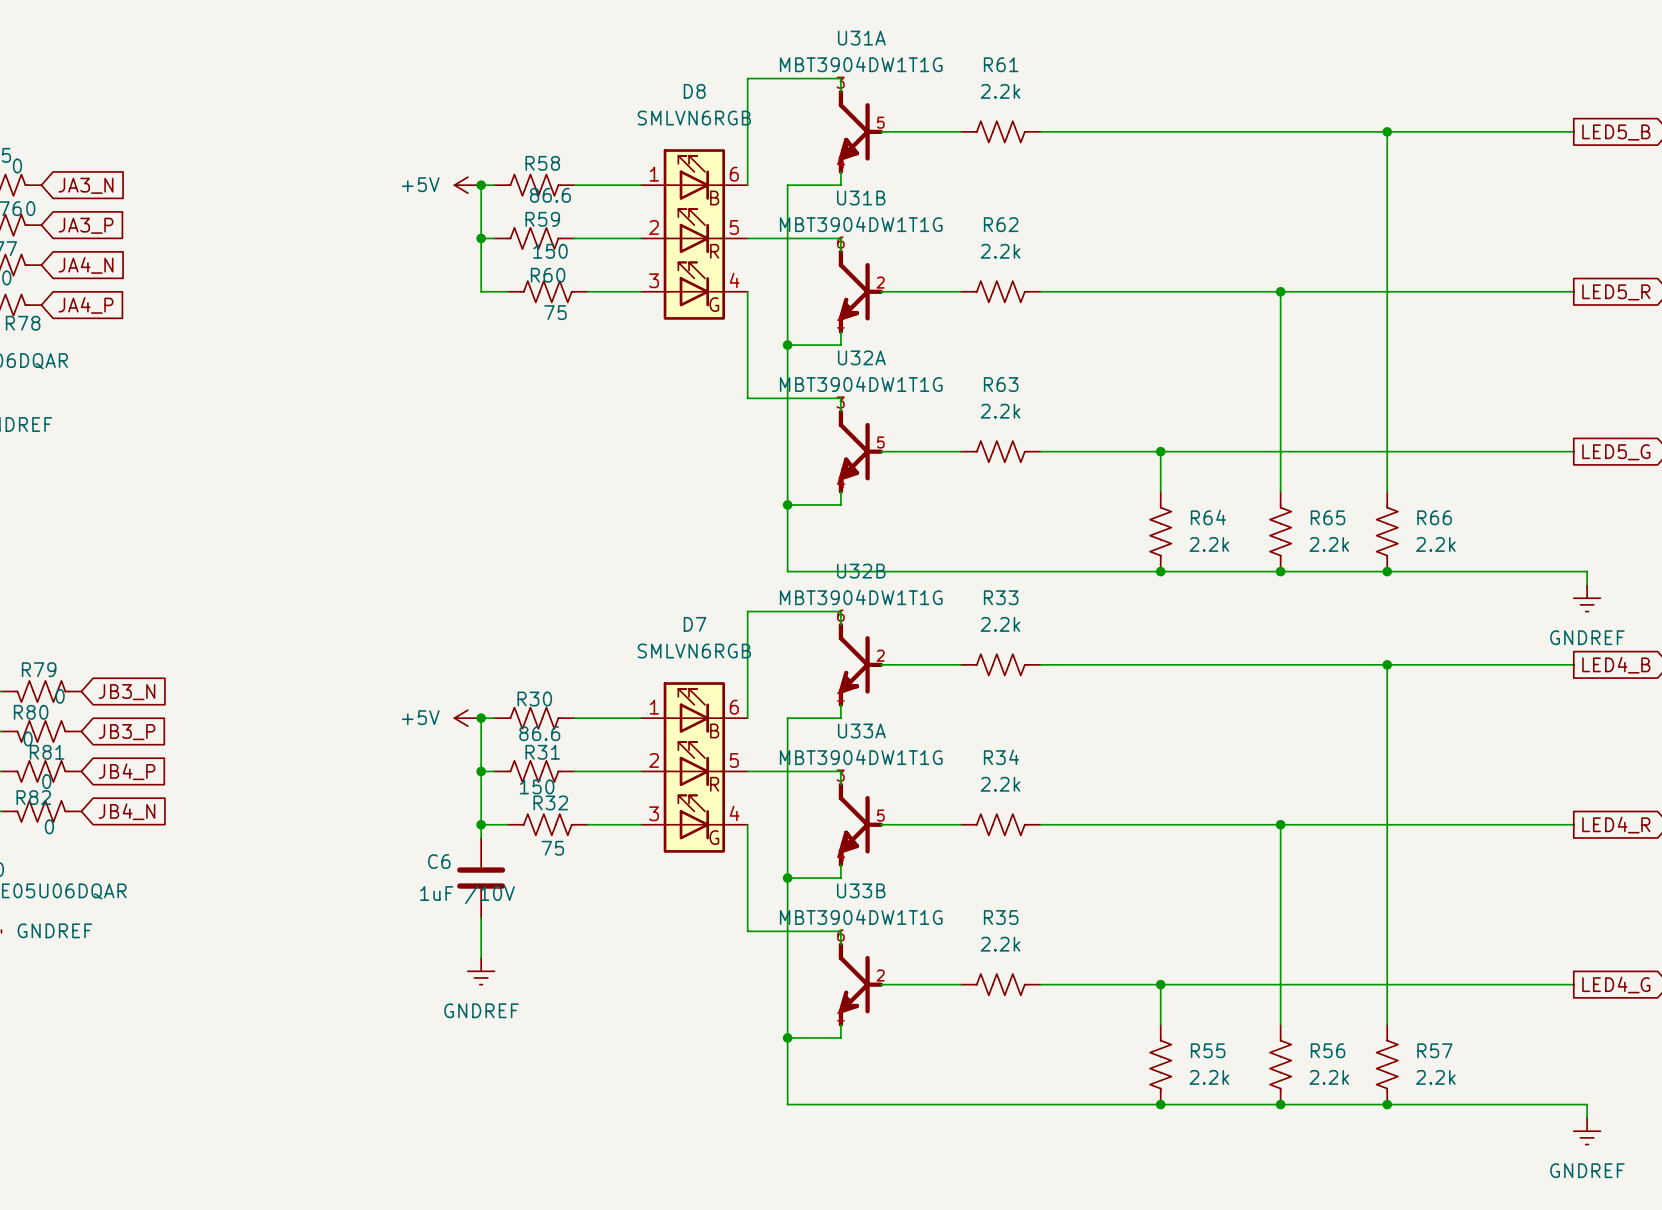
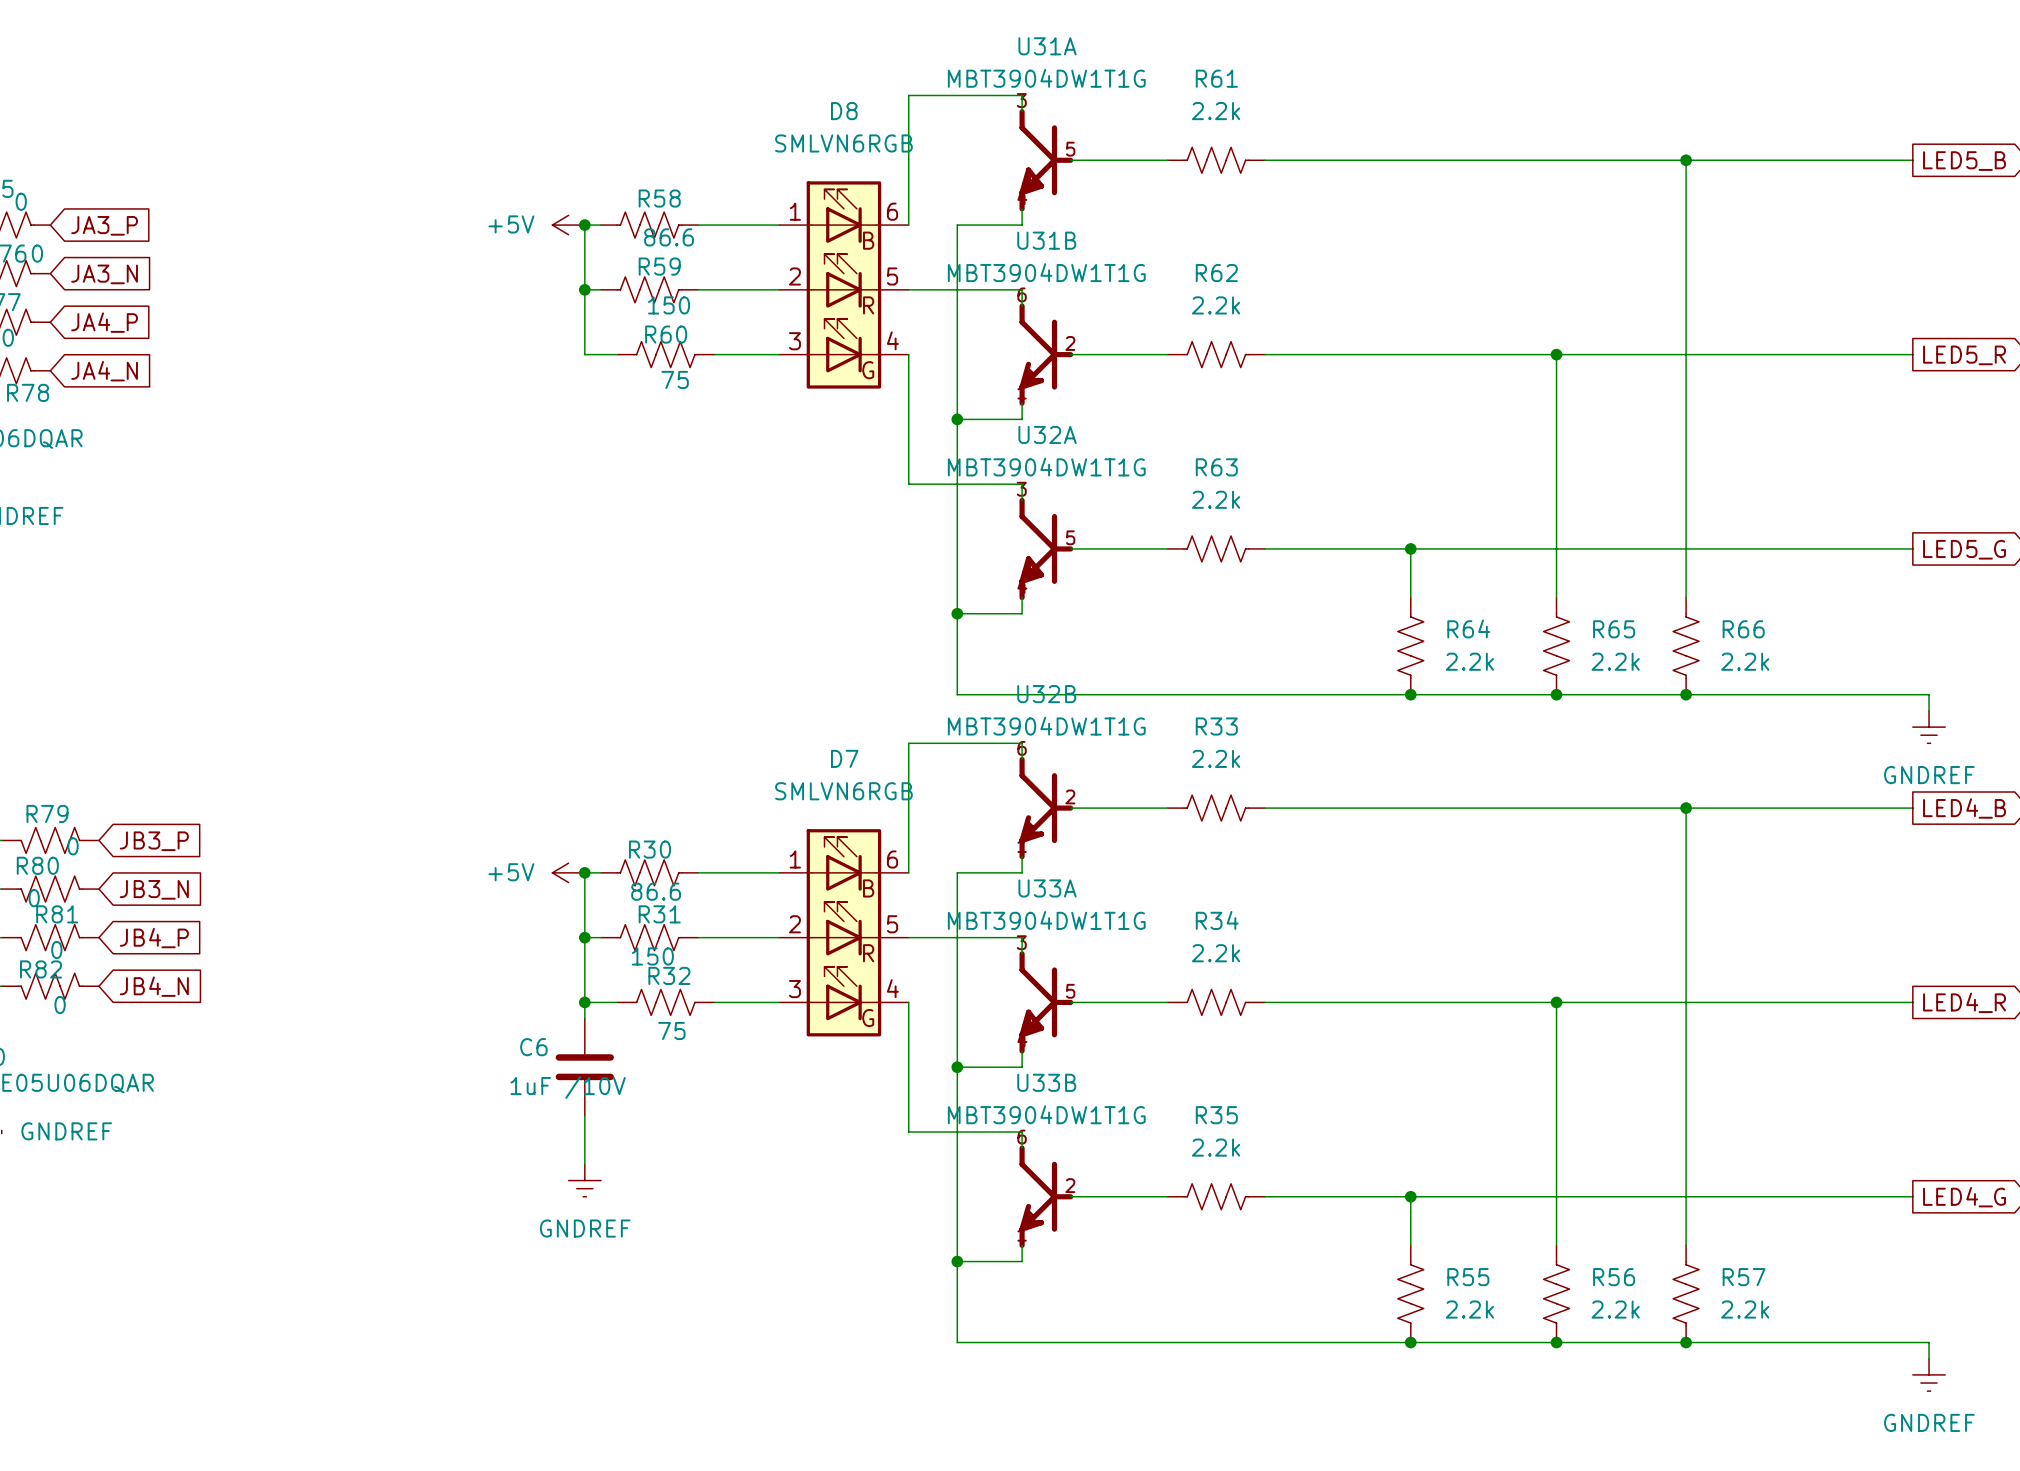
global label: JA3_N (86, 185) -> JA3_P (104, 225)
global label: JA3_P (86, 225) -> JA3_N (104, 274)
global label: JA4_N (86, 265) -> JA4_P (104, 322)
global label: JA4_P (86, 305) -> JA4_N (104, 371)
global label: JB3_N (126, 692) -> JB3_P (154, 841)
global label: JB3_P (126, 732) -> JB3_N (154, 889)

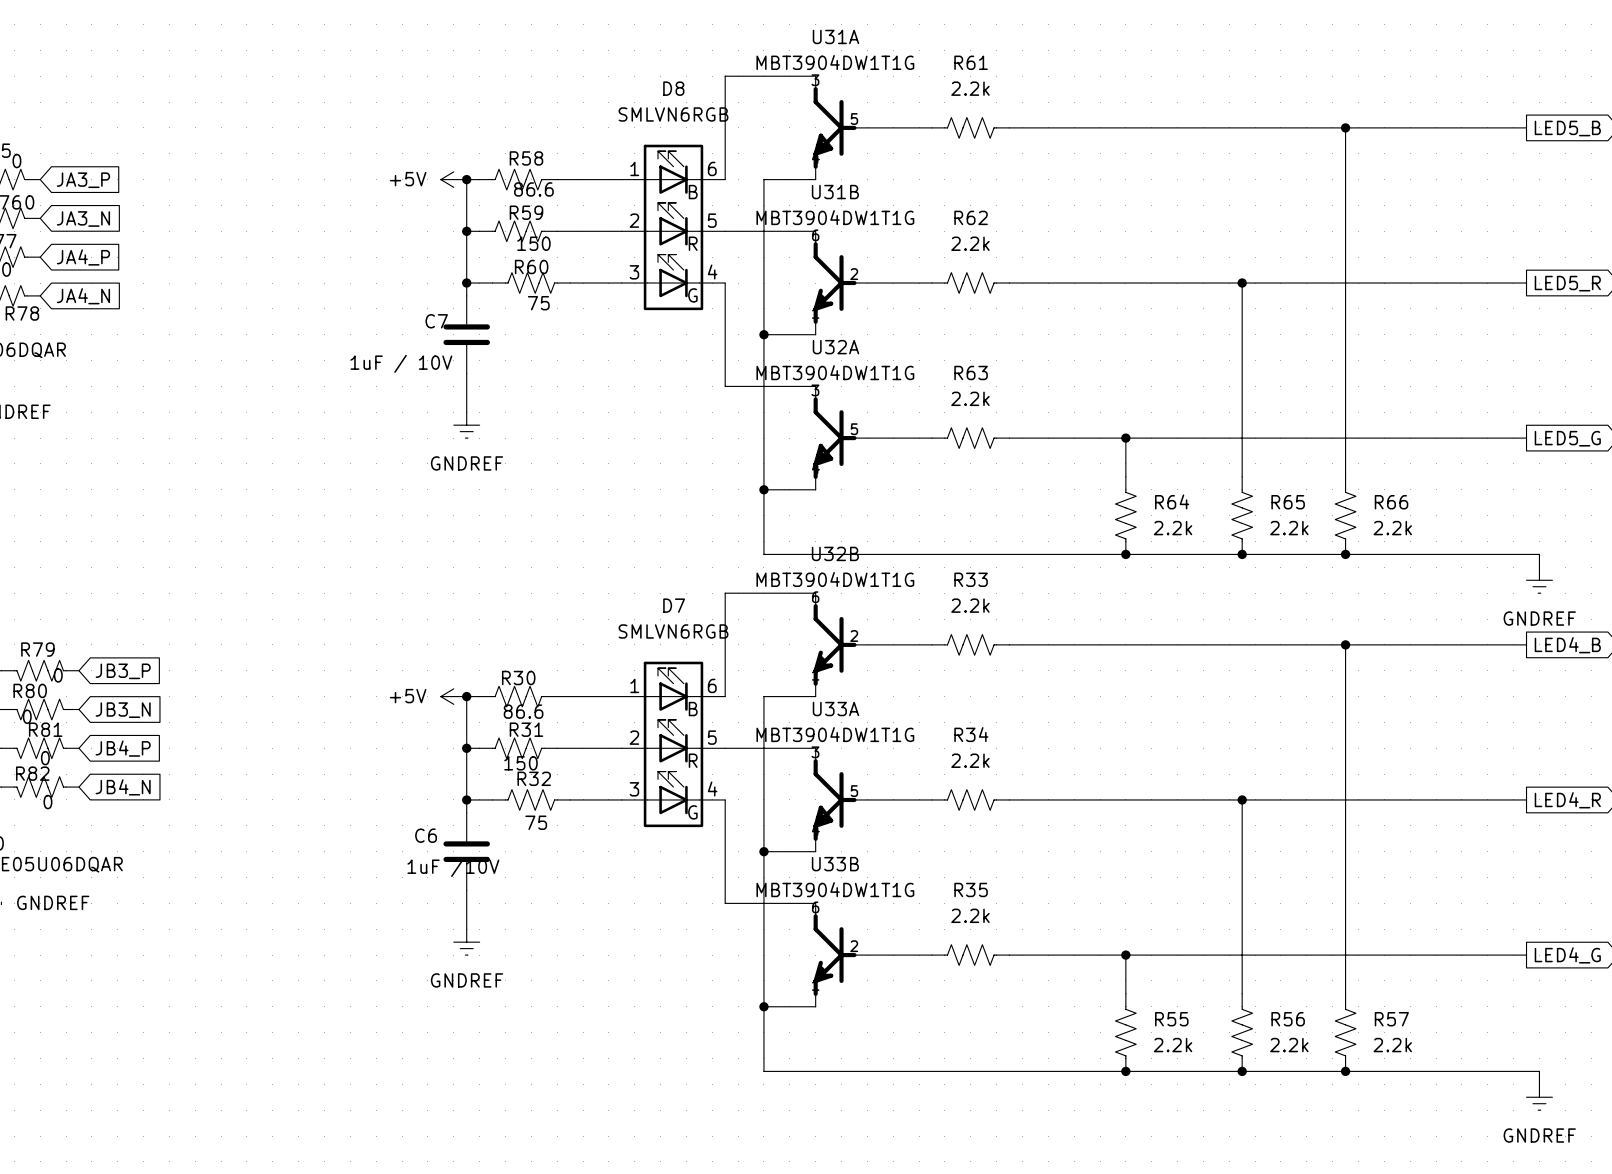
wire: none -> (466, 283) (466, 295)
junction: none -> (466, 283)
C7: none -> 1uF / 10V (466, 334)
wire: none -> (466, 373) (466, 412)
power symbol: none -> GNDREF (466, 425)

